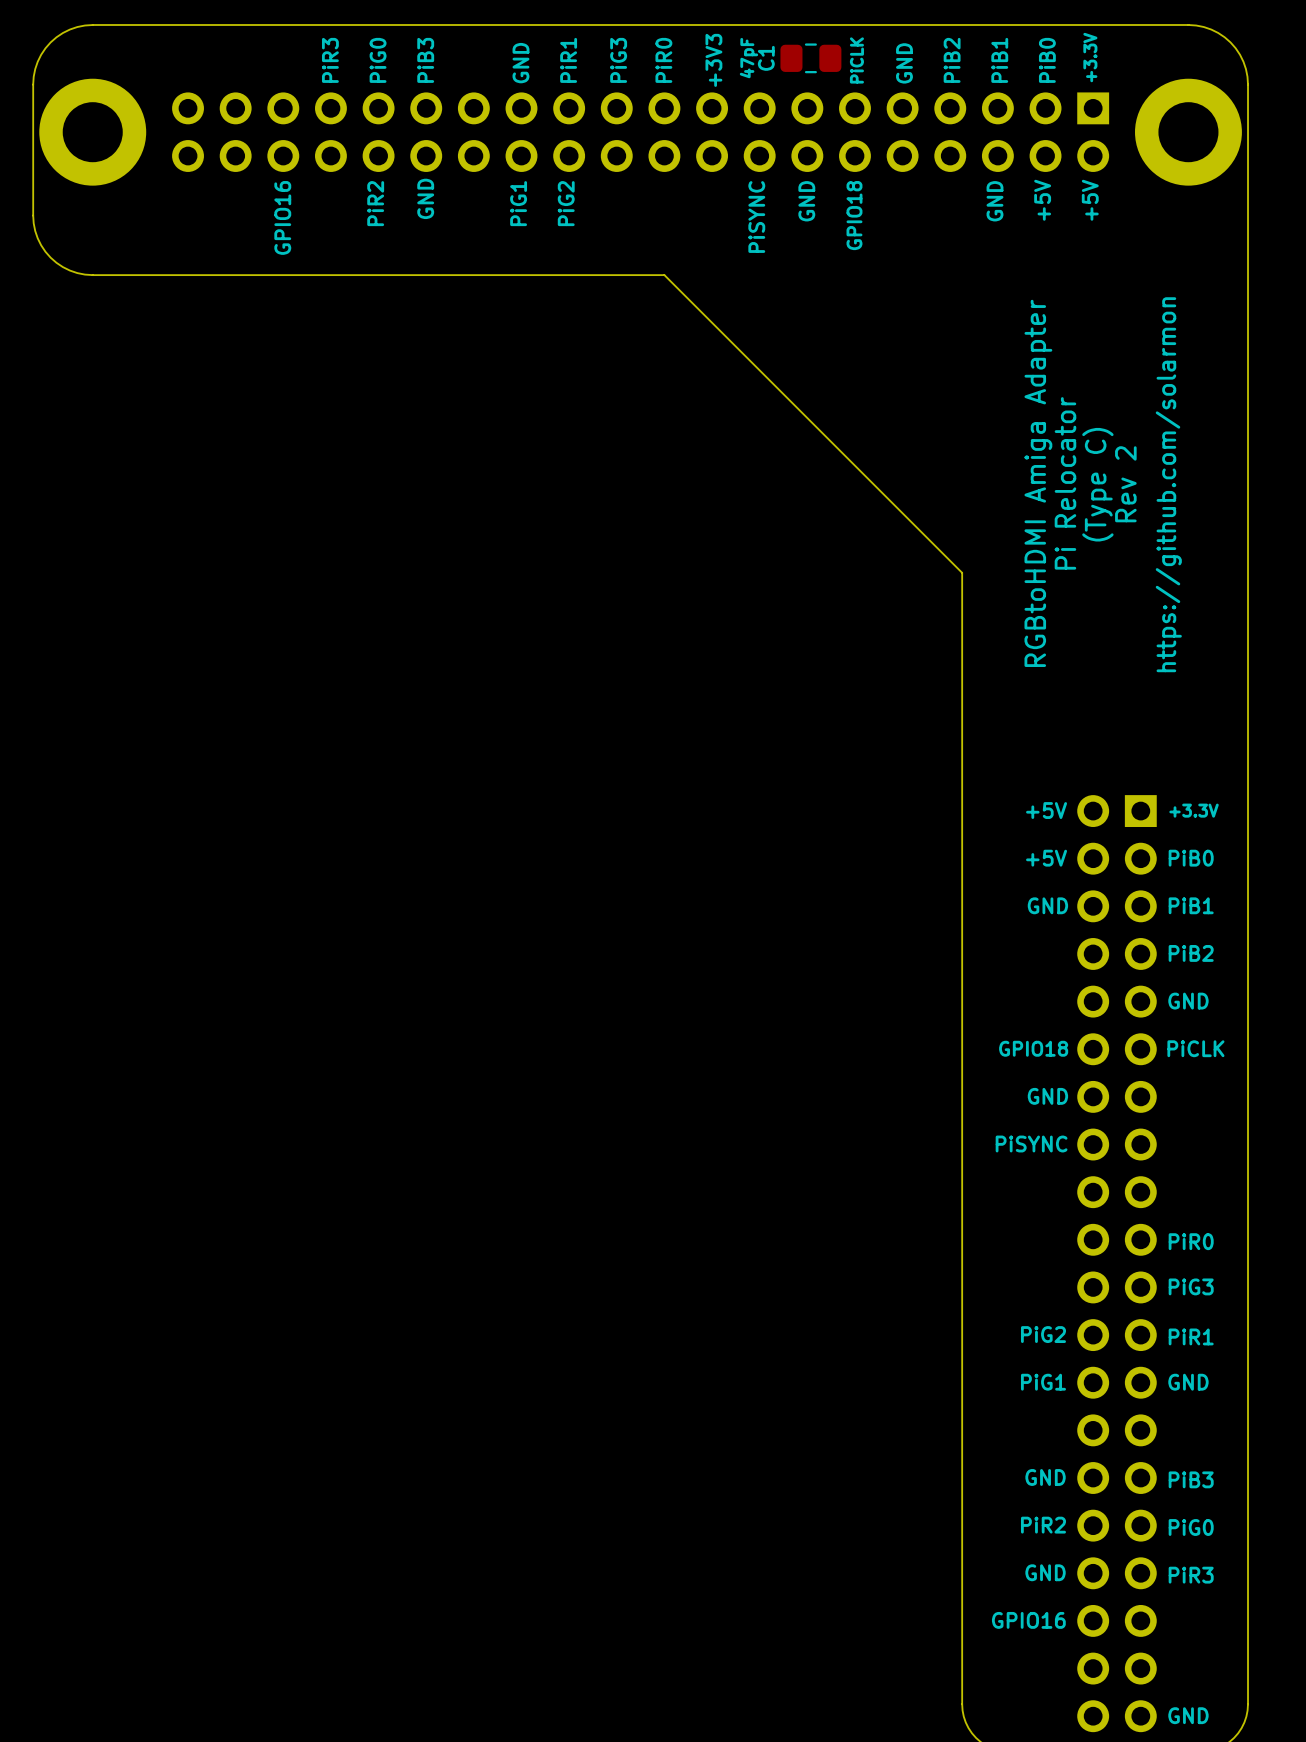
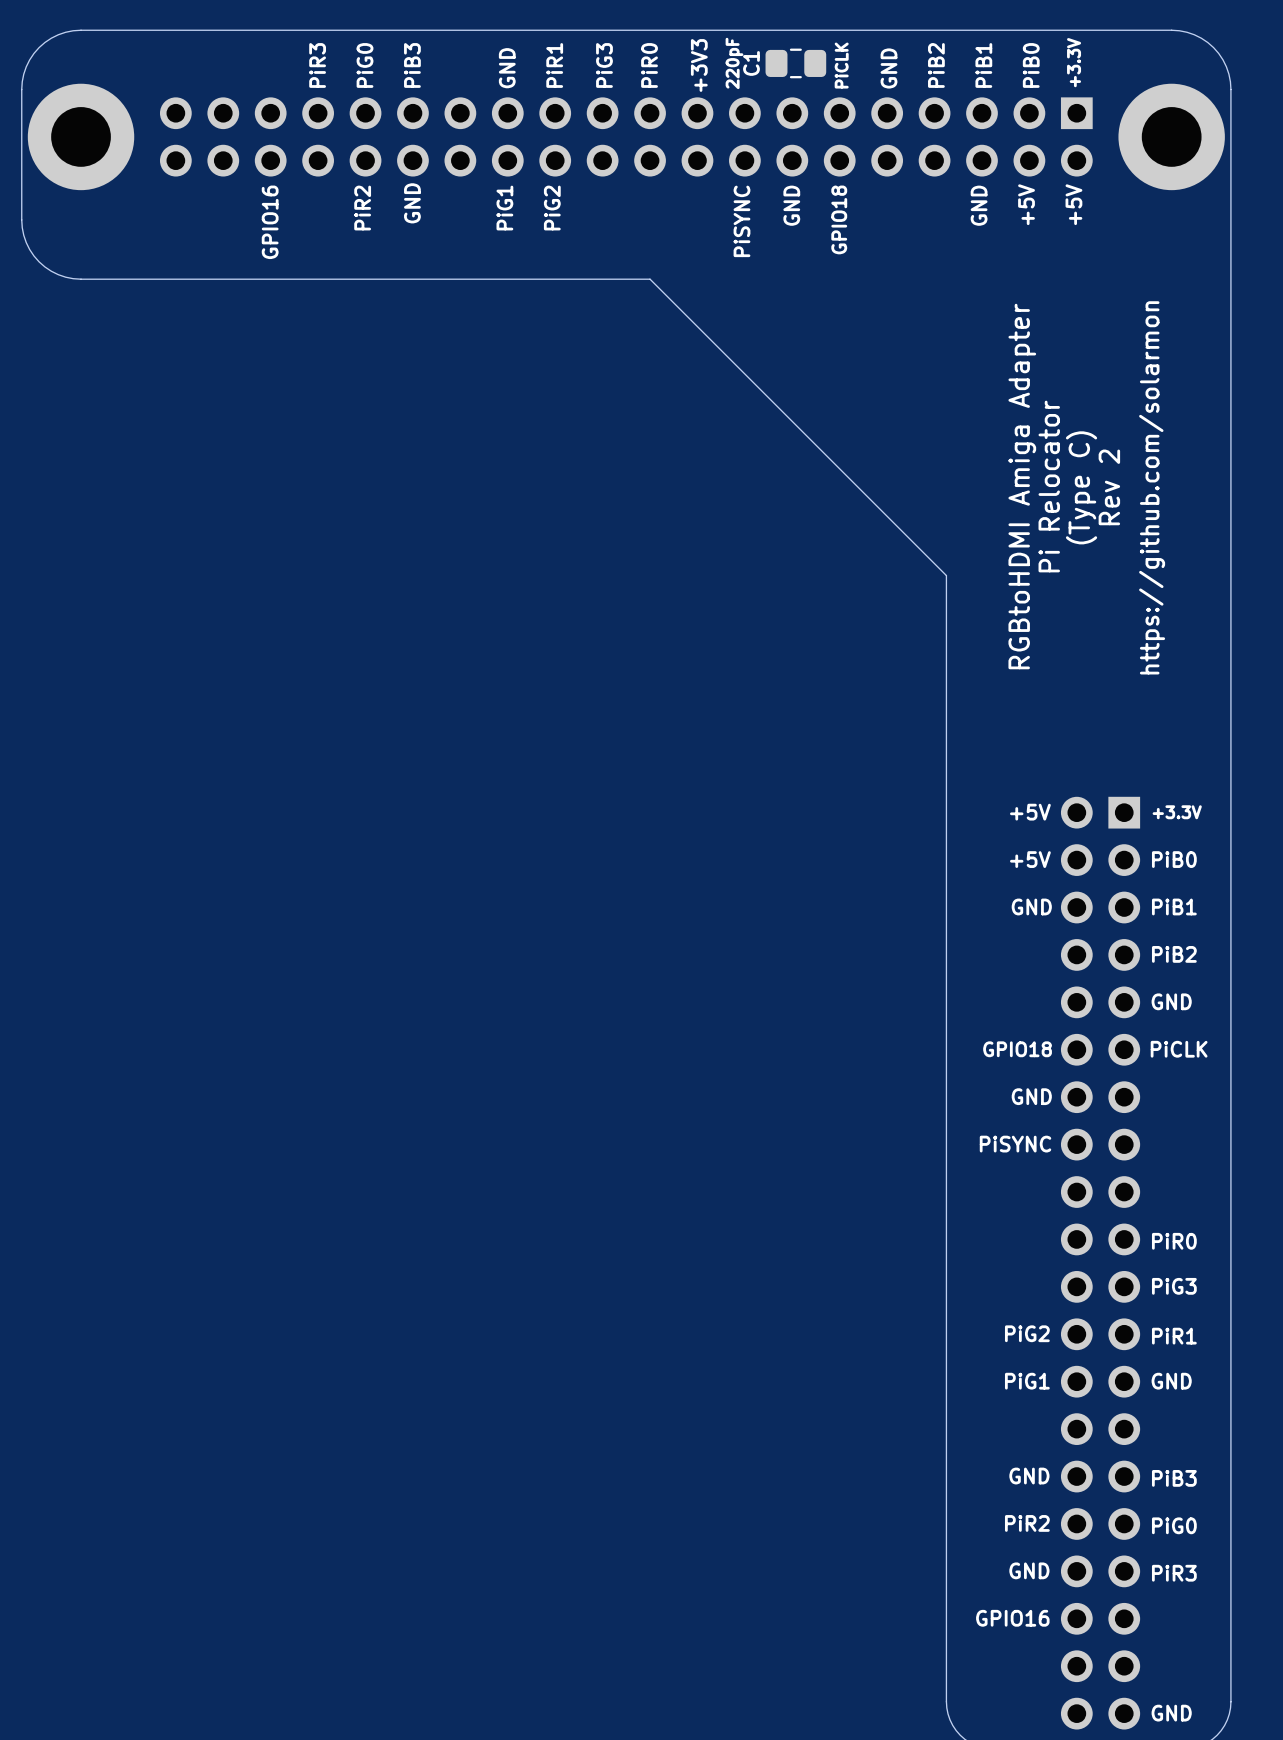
C1 value: 47pF (748, 58) -> 220pF (734, 63)

